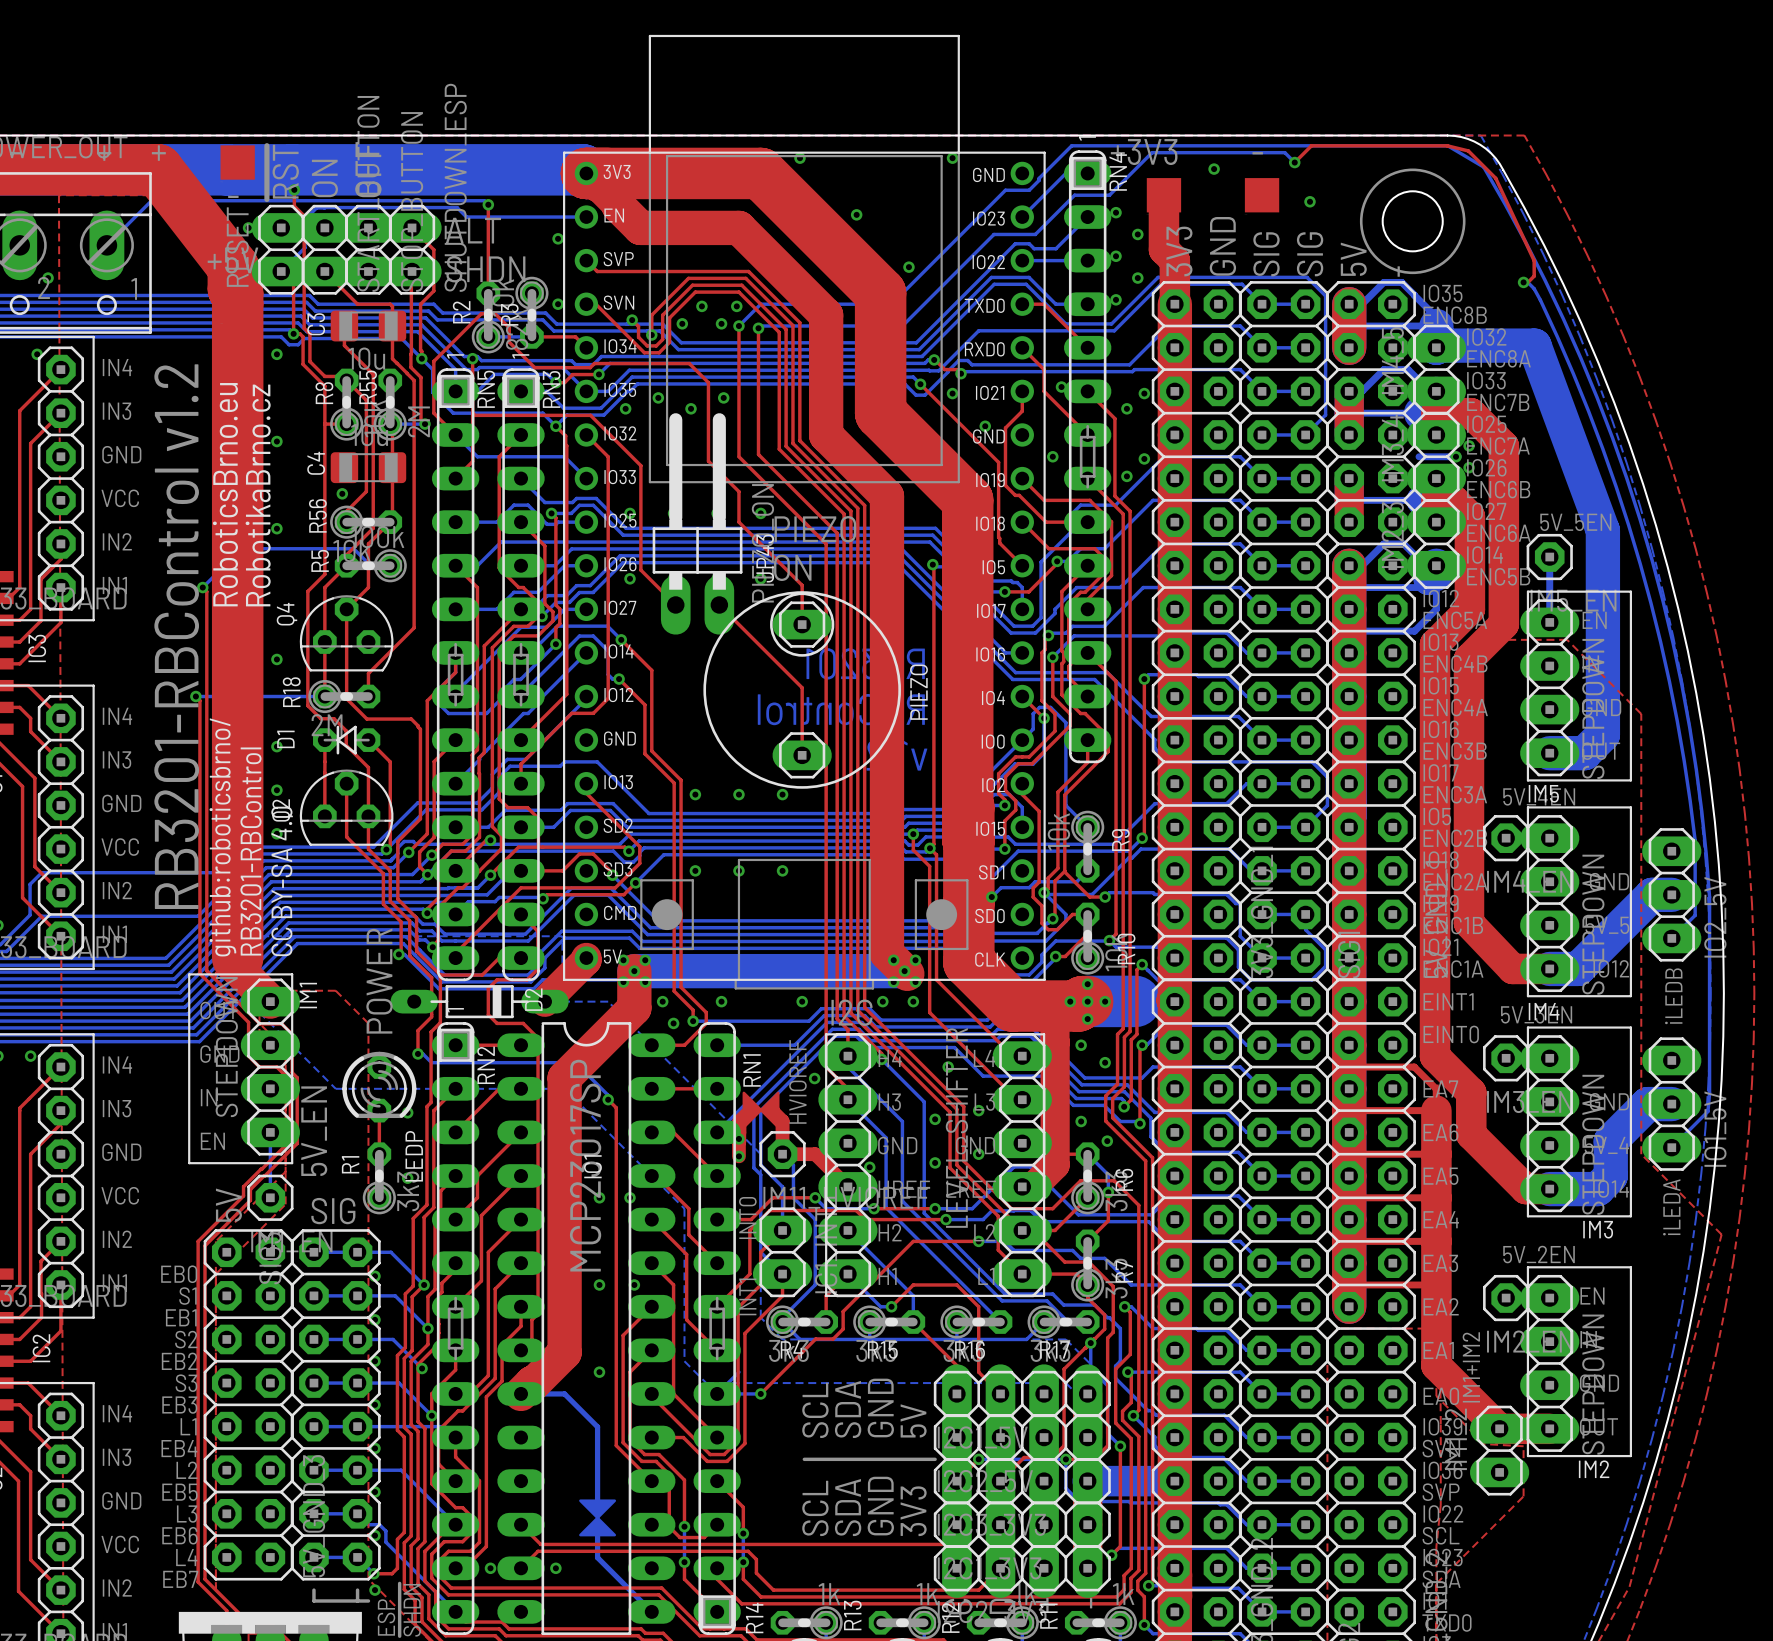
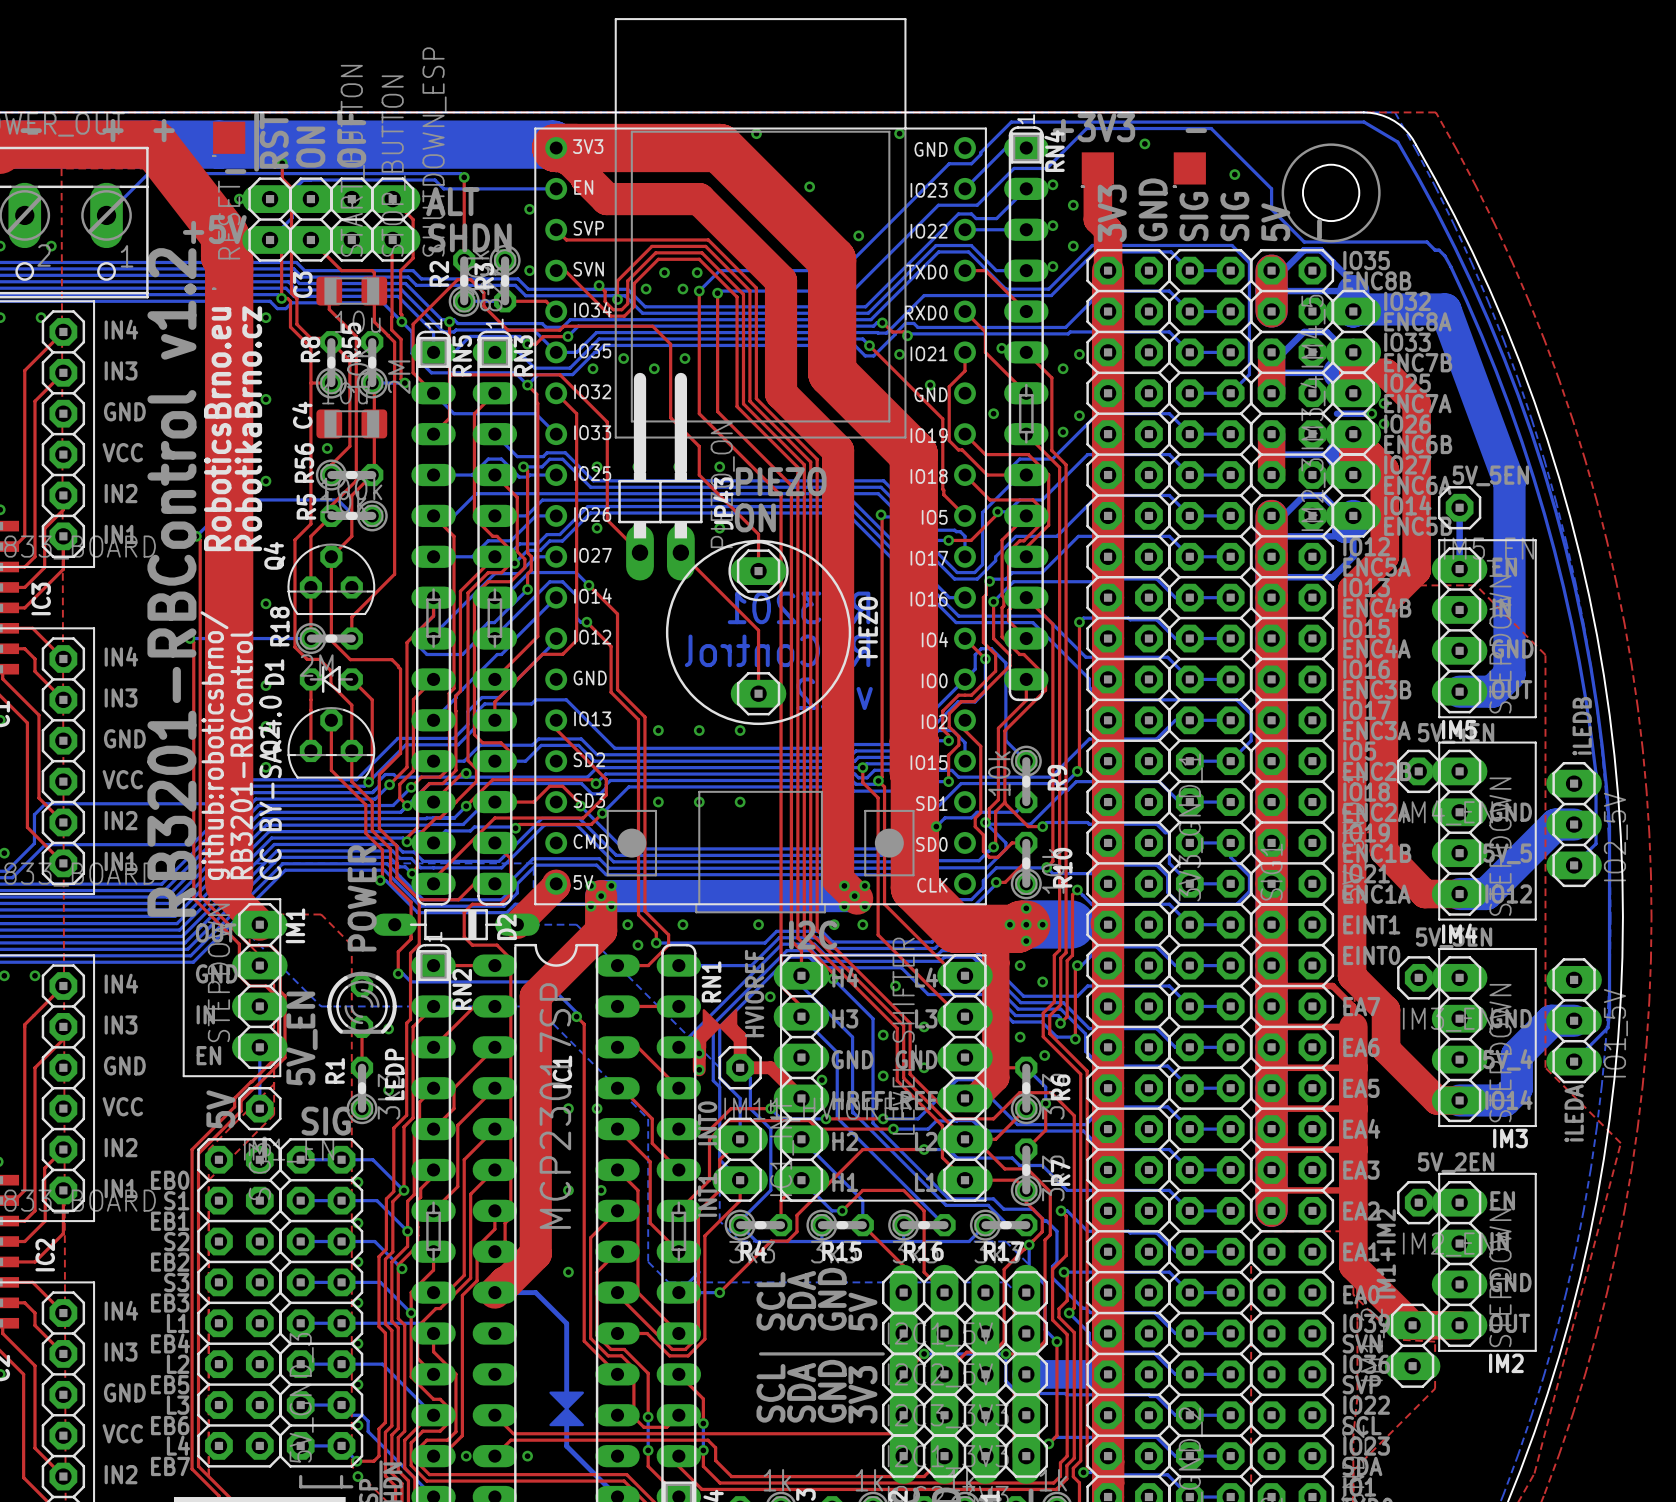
bottom track: none -> (1220, 137) (1271, 188) (1271, 209) (1304, 242) (1426, 242) (1435, 250)
top track: (1294, 162) (1311, 145) (1447, 145) (1468, 150) (1495, 178) (1534, 260) (1534, 276) (1527, 282) (1523, 282) -> none
via: (1294, 162) -> none
via: (1523, 282) -> none
text position: iLEDB (1673, 996) -> iLEDB (1582, 726)

